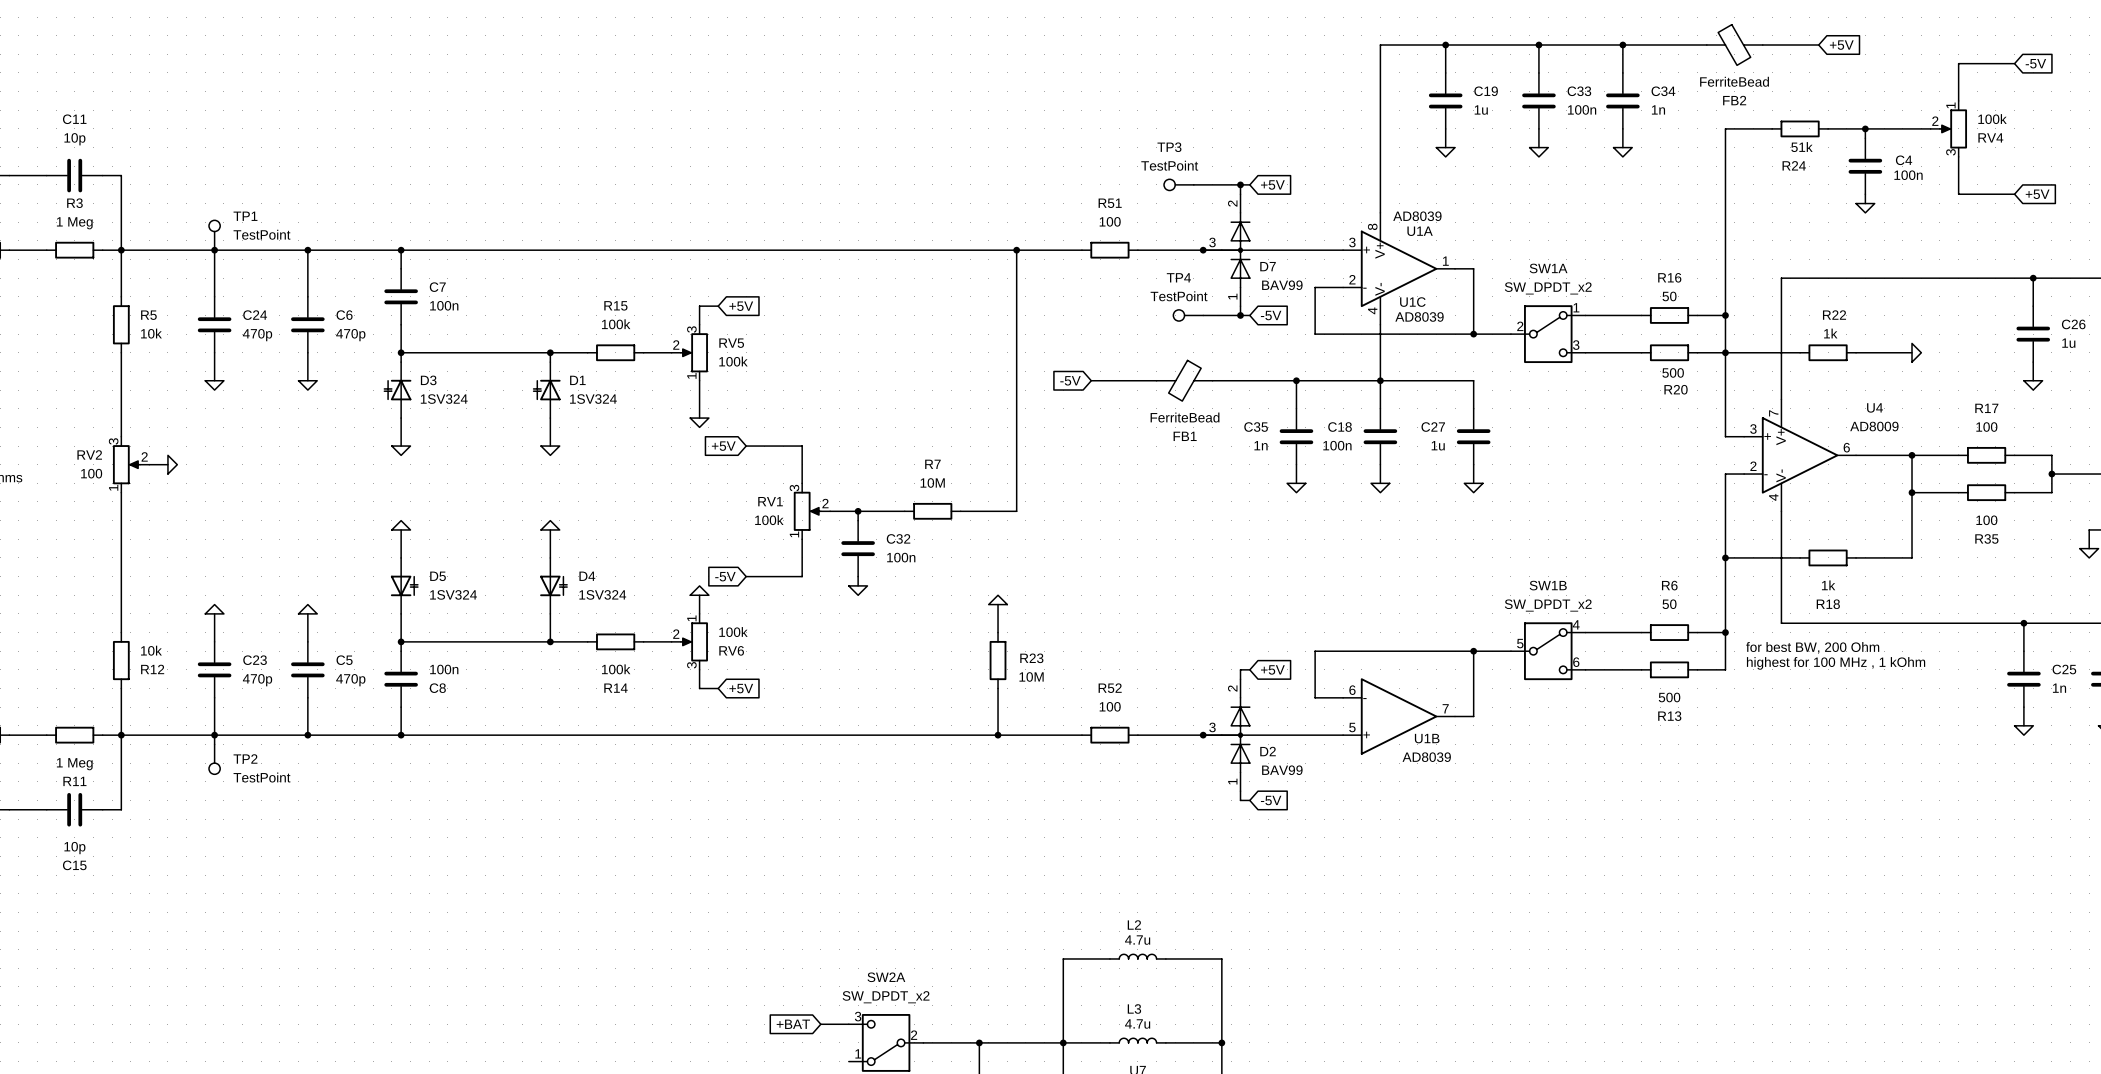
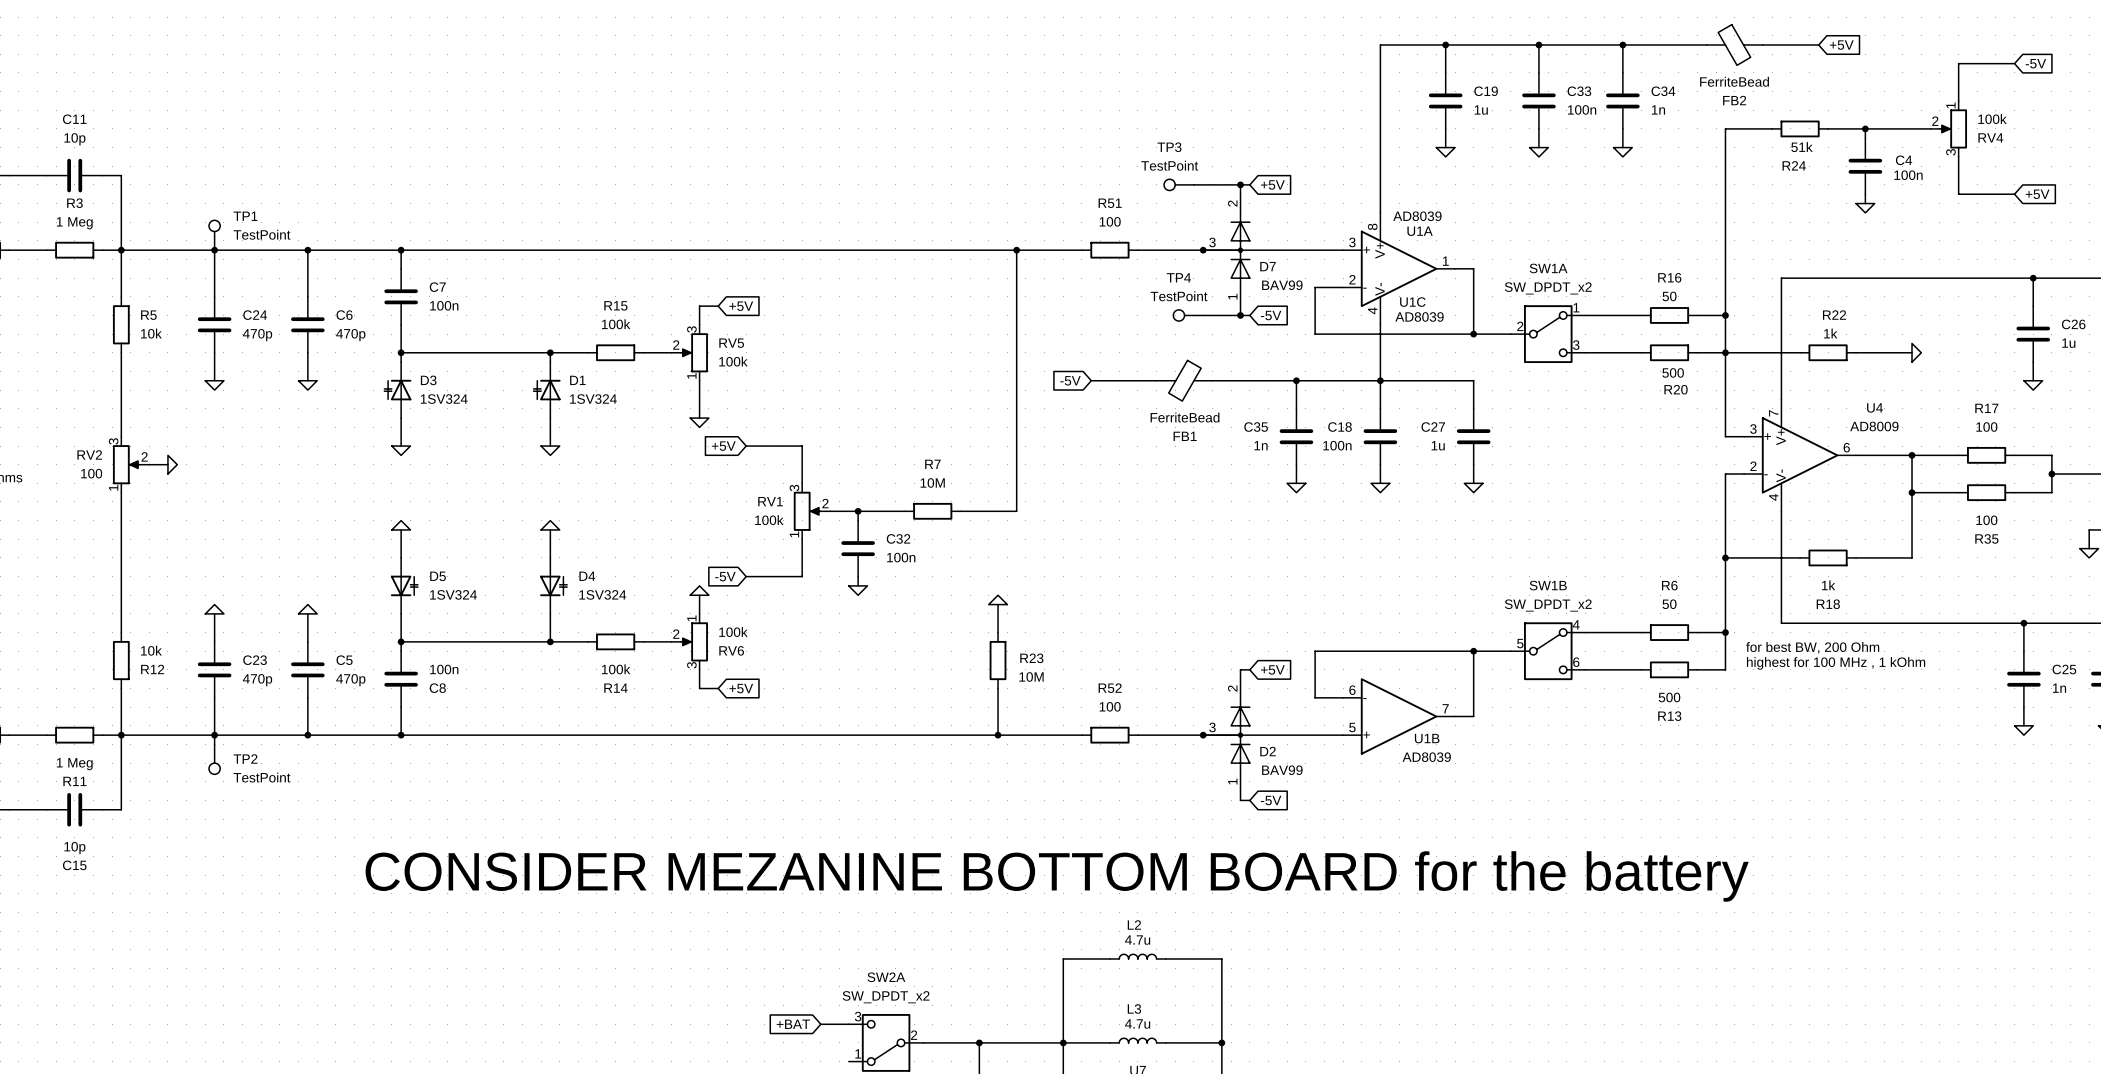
text: none -> CONSIDER MEZANINE BOTTOM BOARD for the battery (1057, 876)

